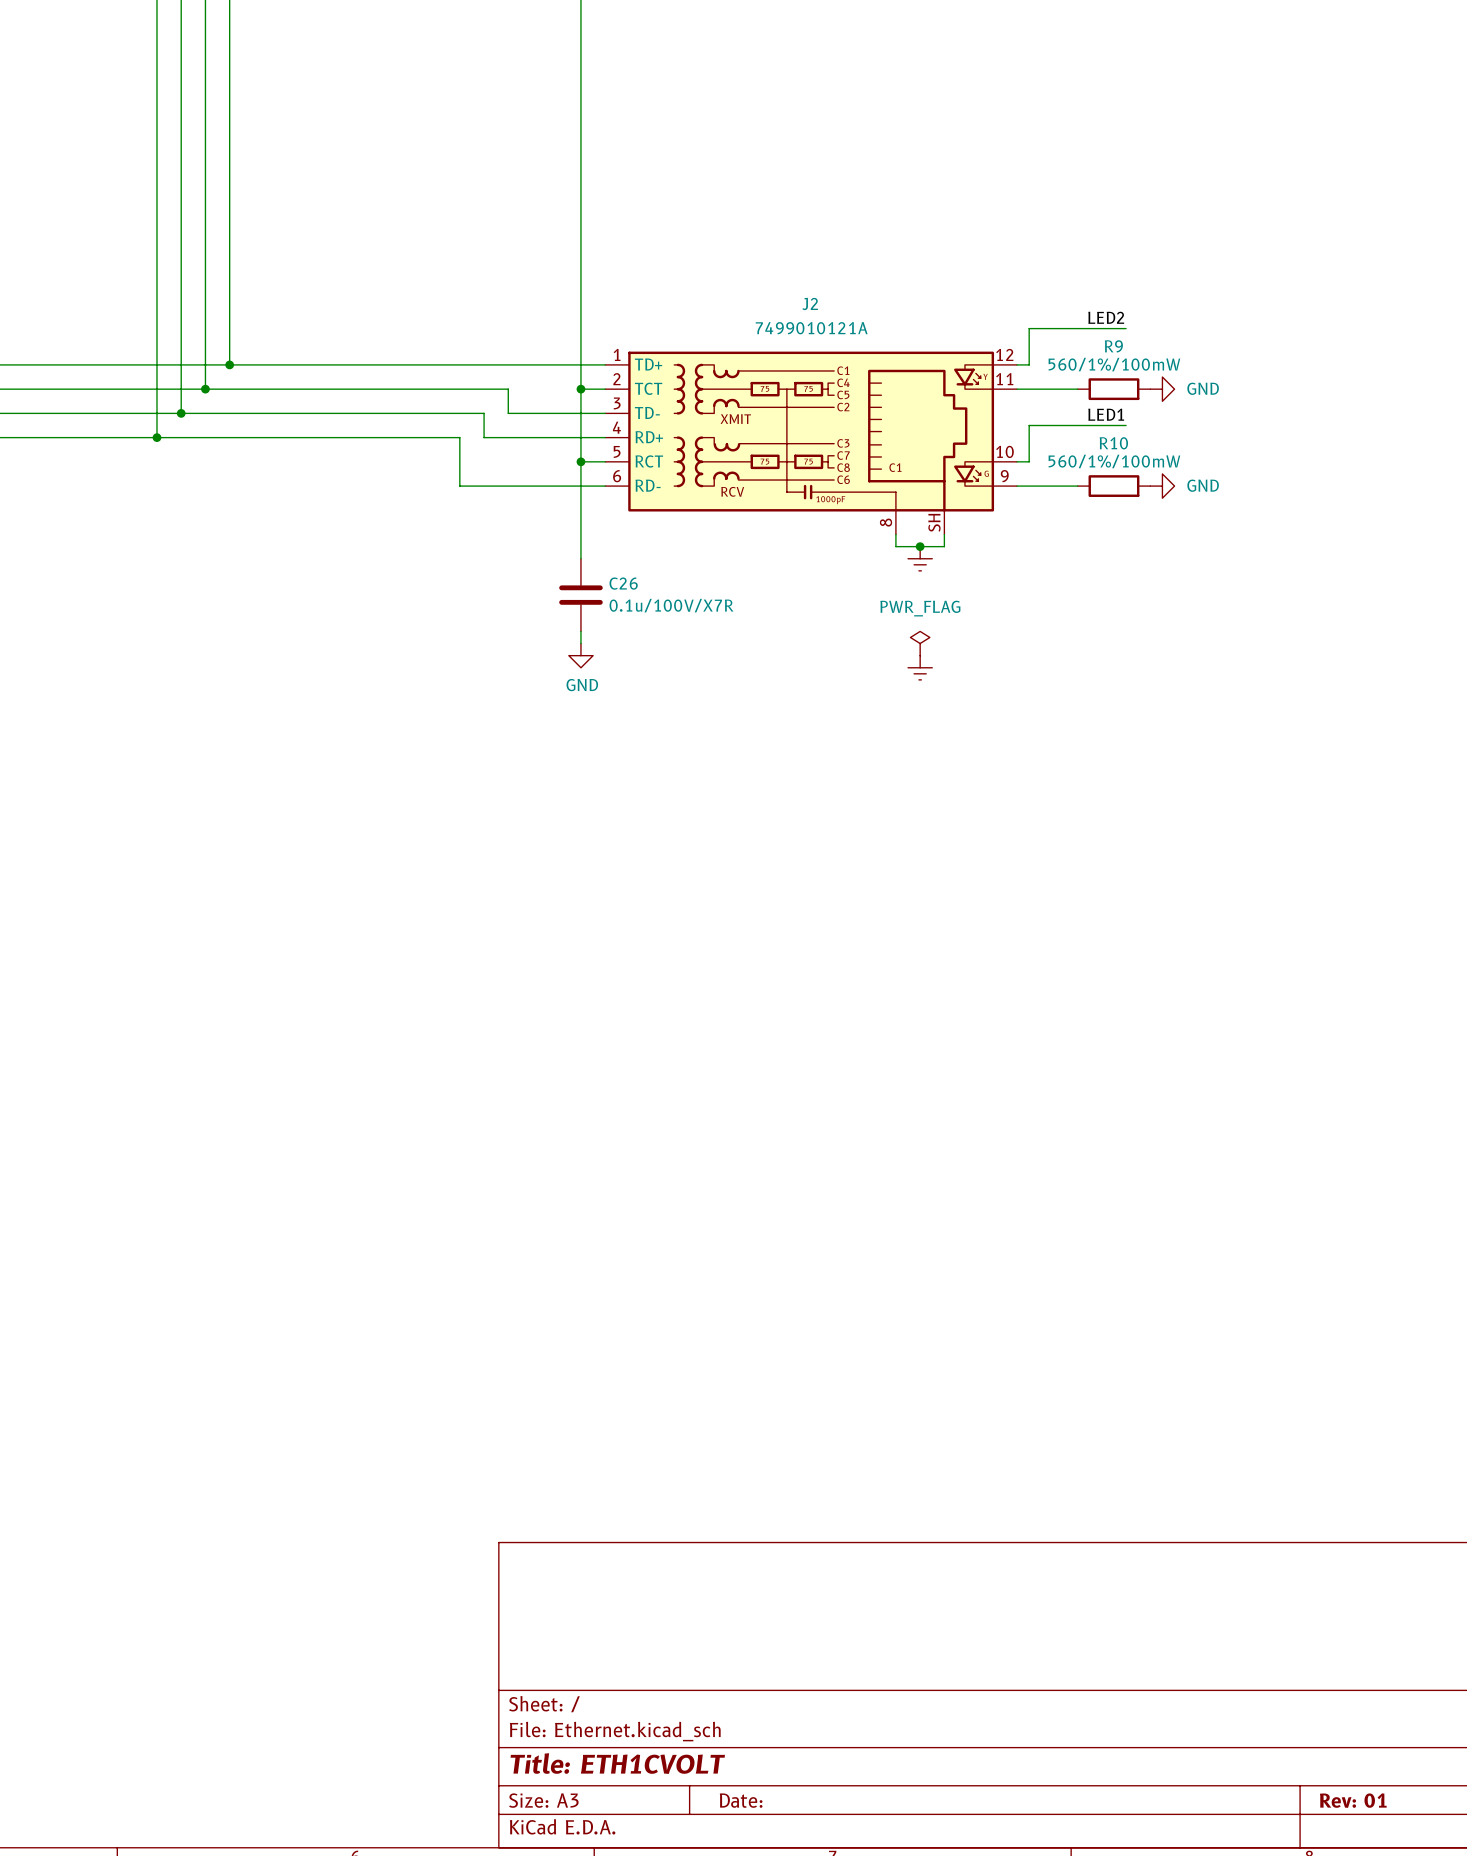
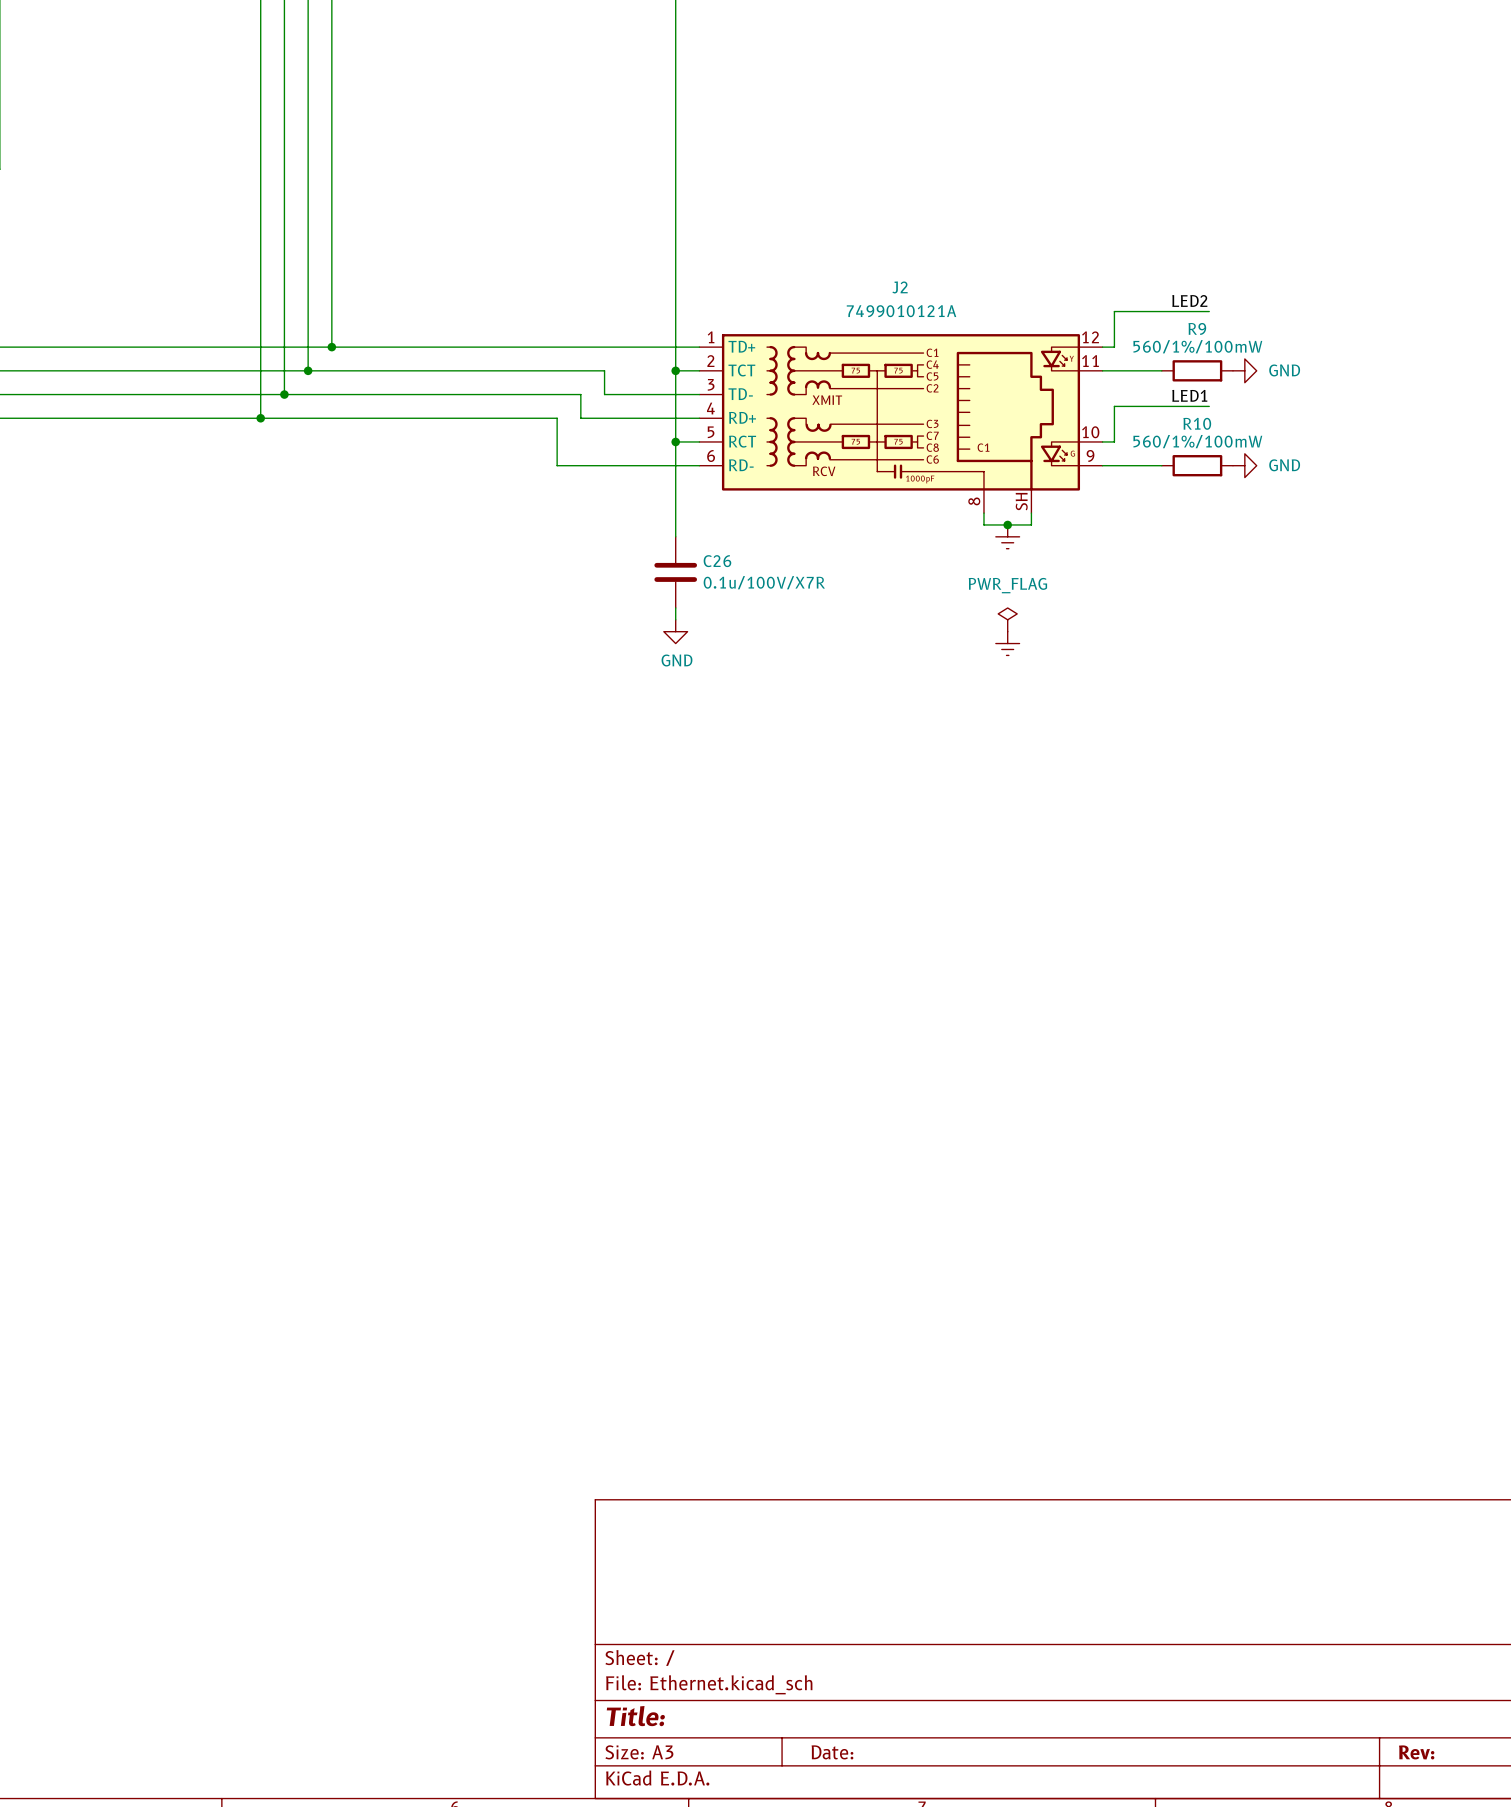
title block: Title: ETH1CVOLT (617, 1763) -> Title: (635, 1716)
title block: Rev: 01 (1353, 1800) -> Rev: (1416, 1752)

